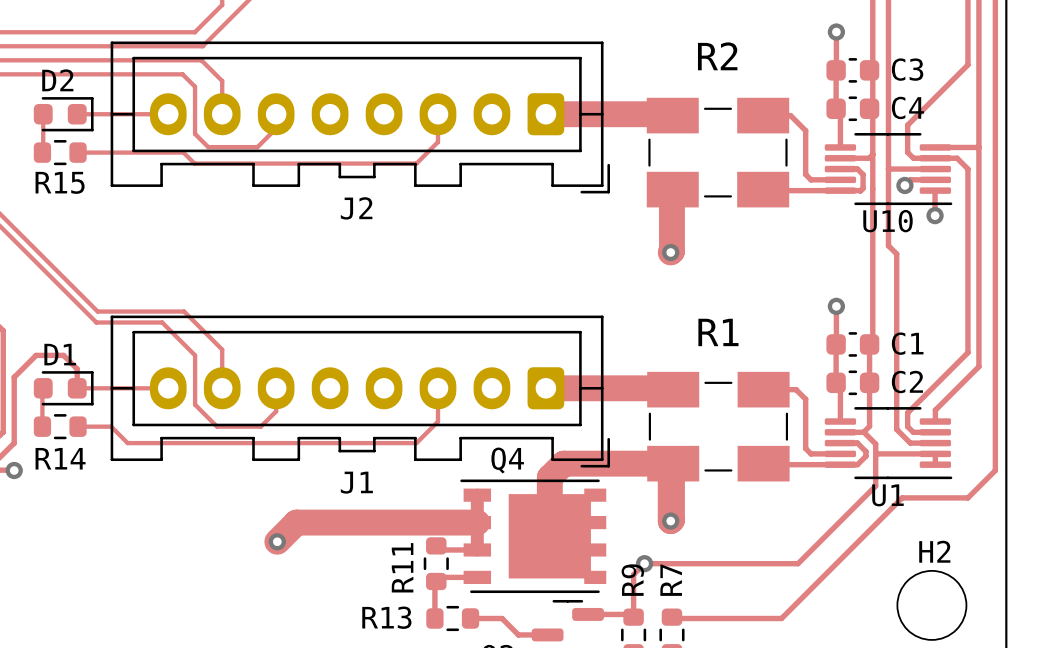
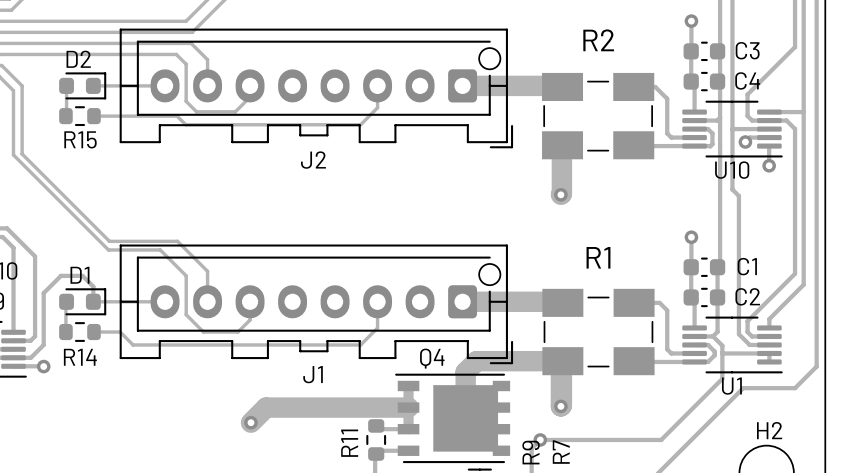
J2 footprint: [110, 41, 610, 194] -> [119, 28, 514, 149]
J1 footprint: [110, 315, 610, 468] -> [119, 244, 514, 365]

